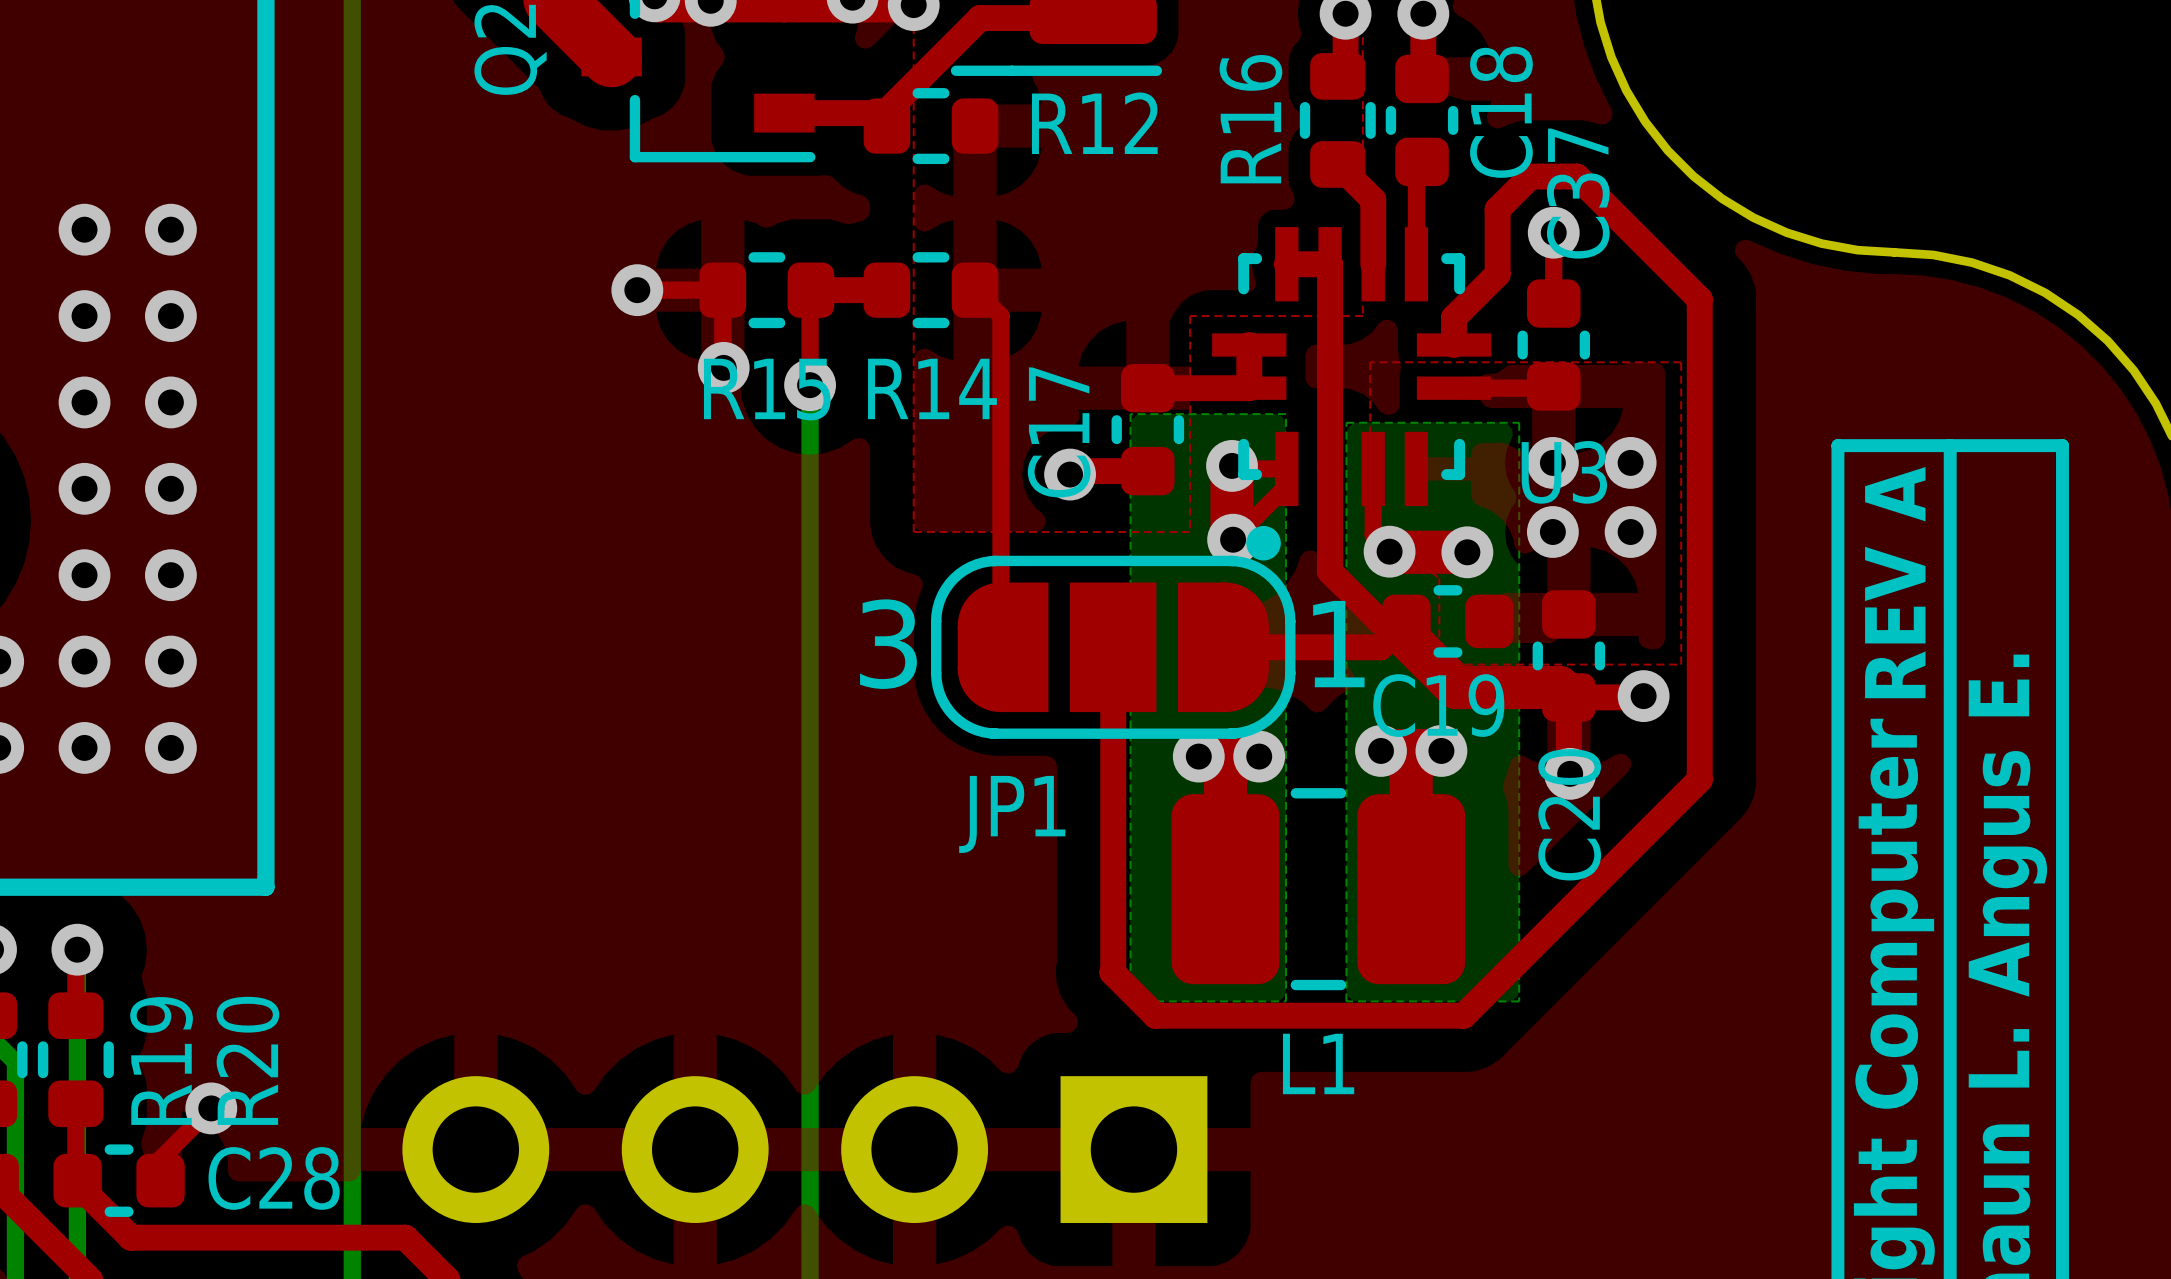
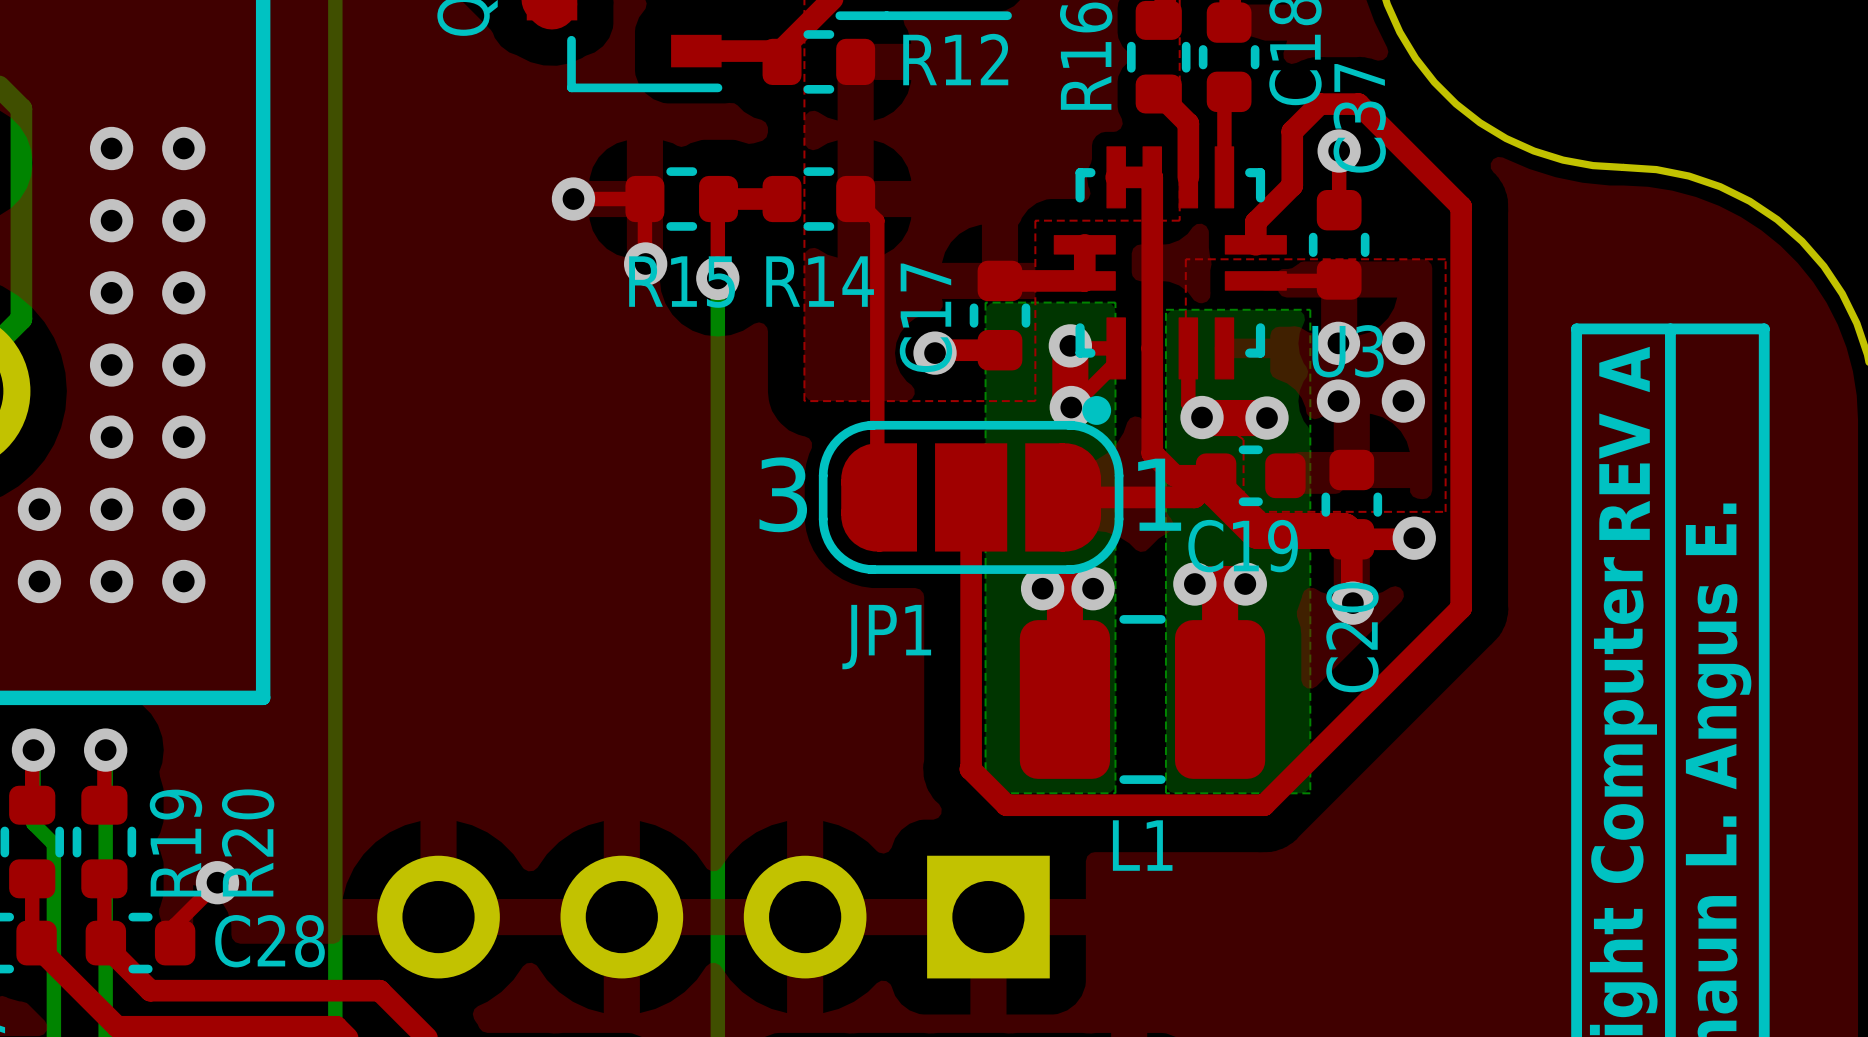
top track: (1330, 571) (1379, 621) -> (1152, 434) (1152, 453) (1174, 475) (1193, 475)

